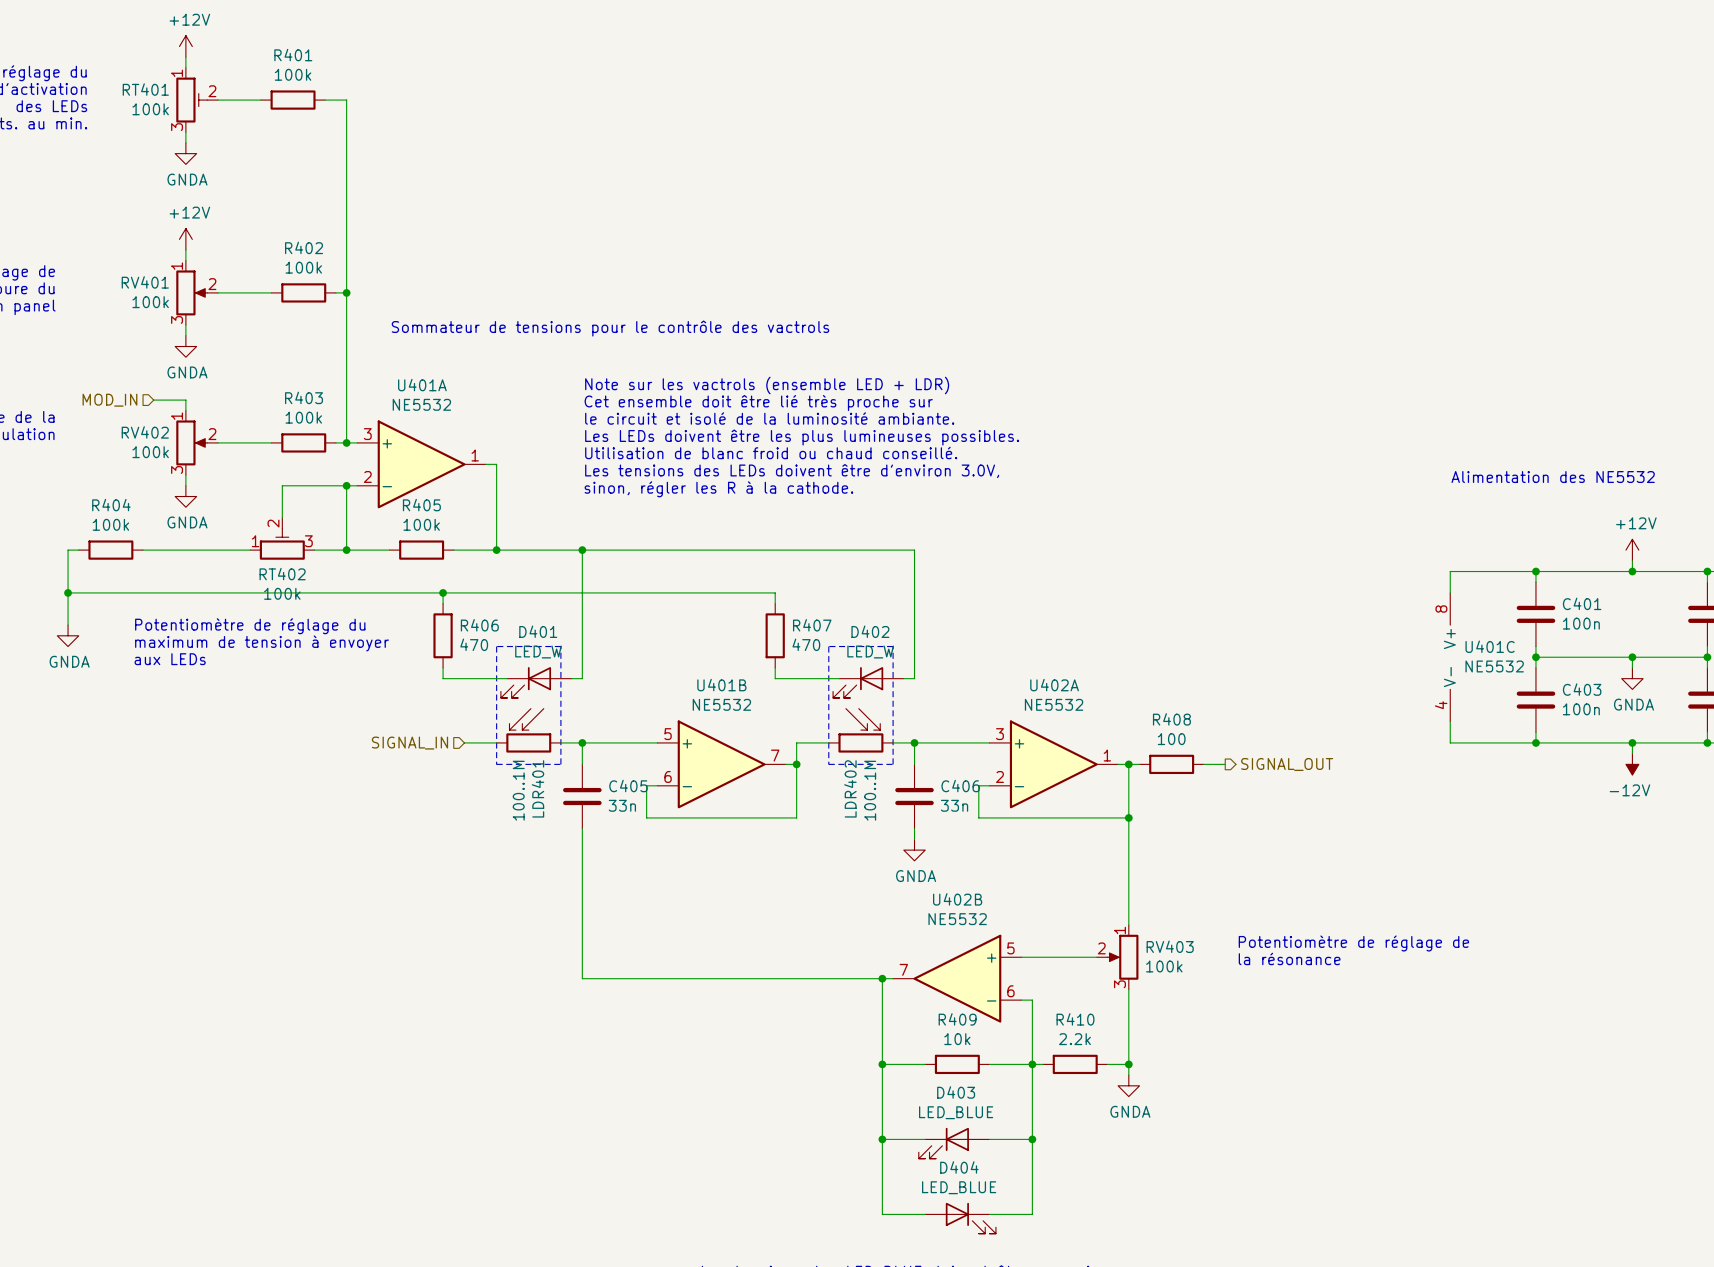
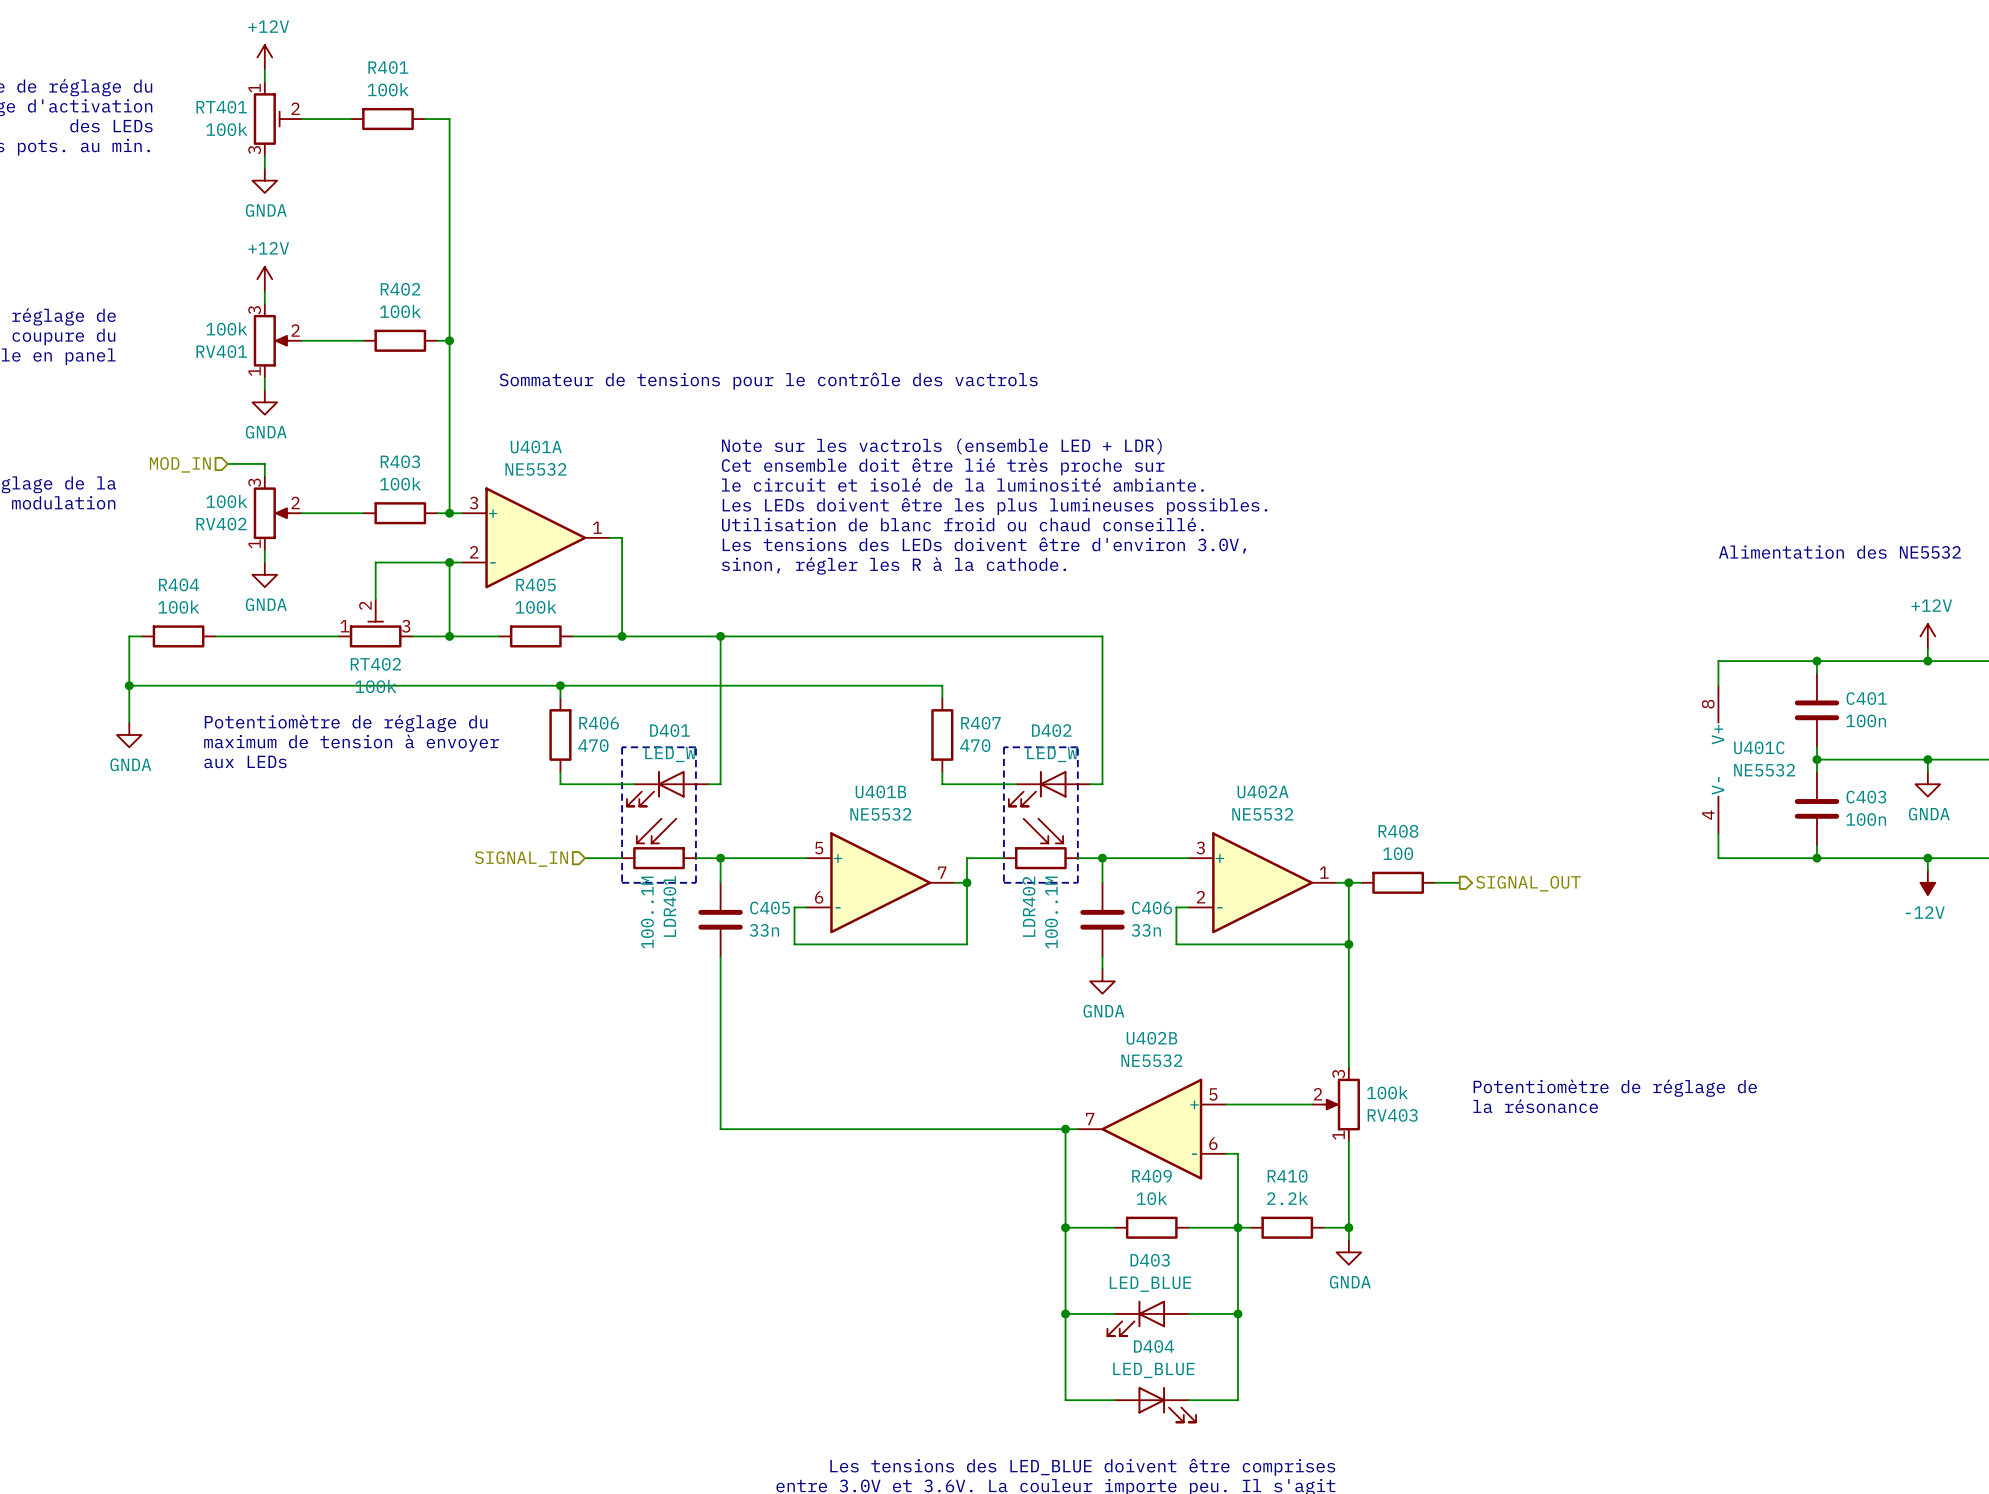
RV401 flip: as is (191, 292) -> up-down (271, 340)
RV402 flip: as is (191, 442) -> up-down (271, 513)
RV403 flip: as is (1122, 957) -> up-down (1342, 1104)

